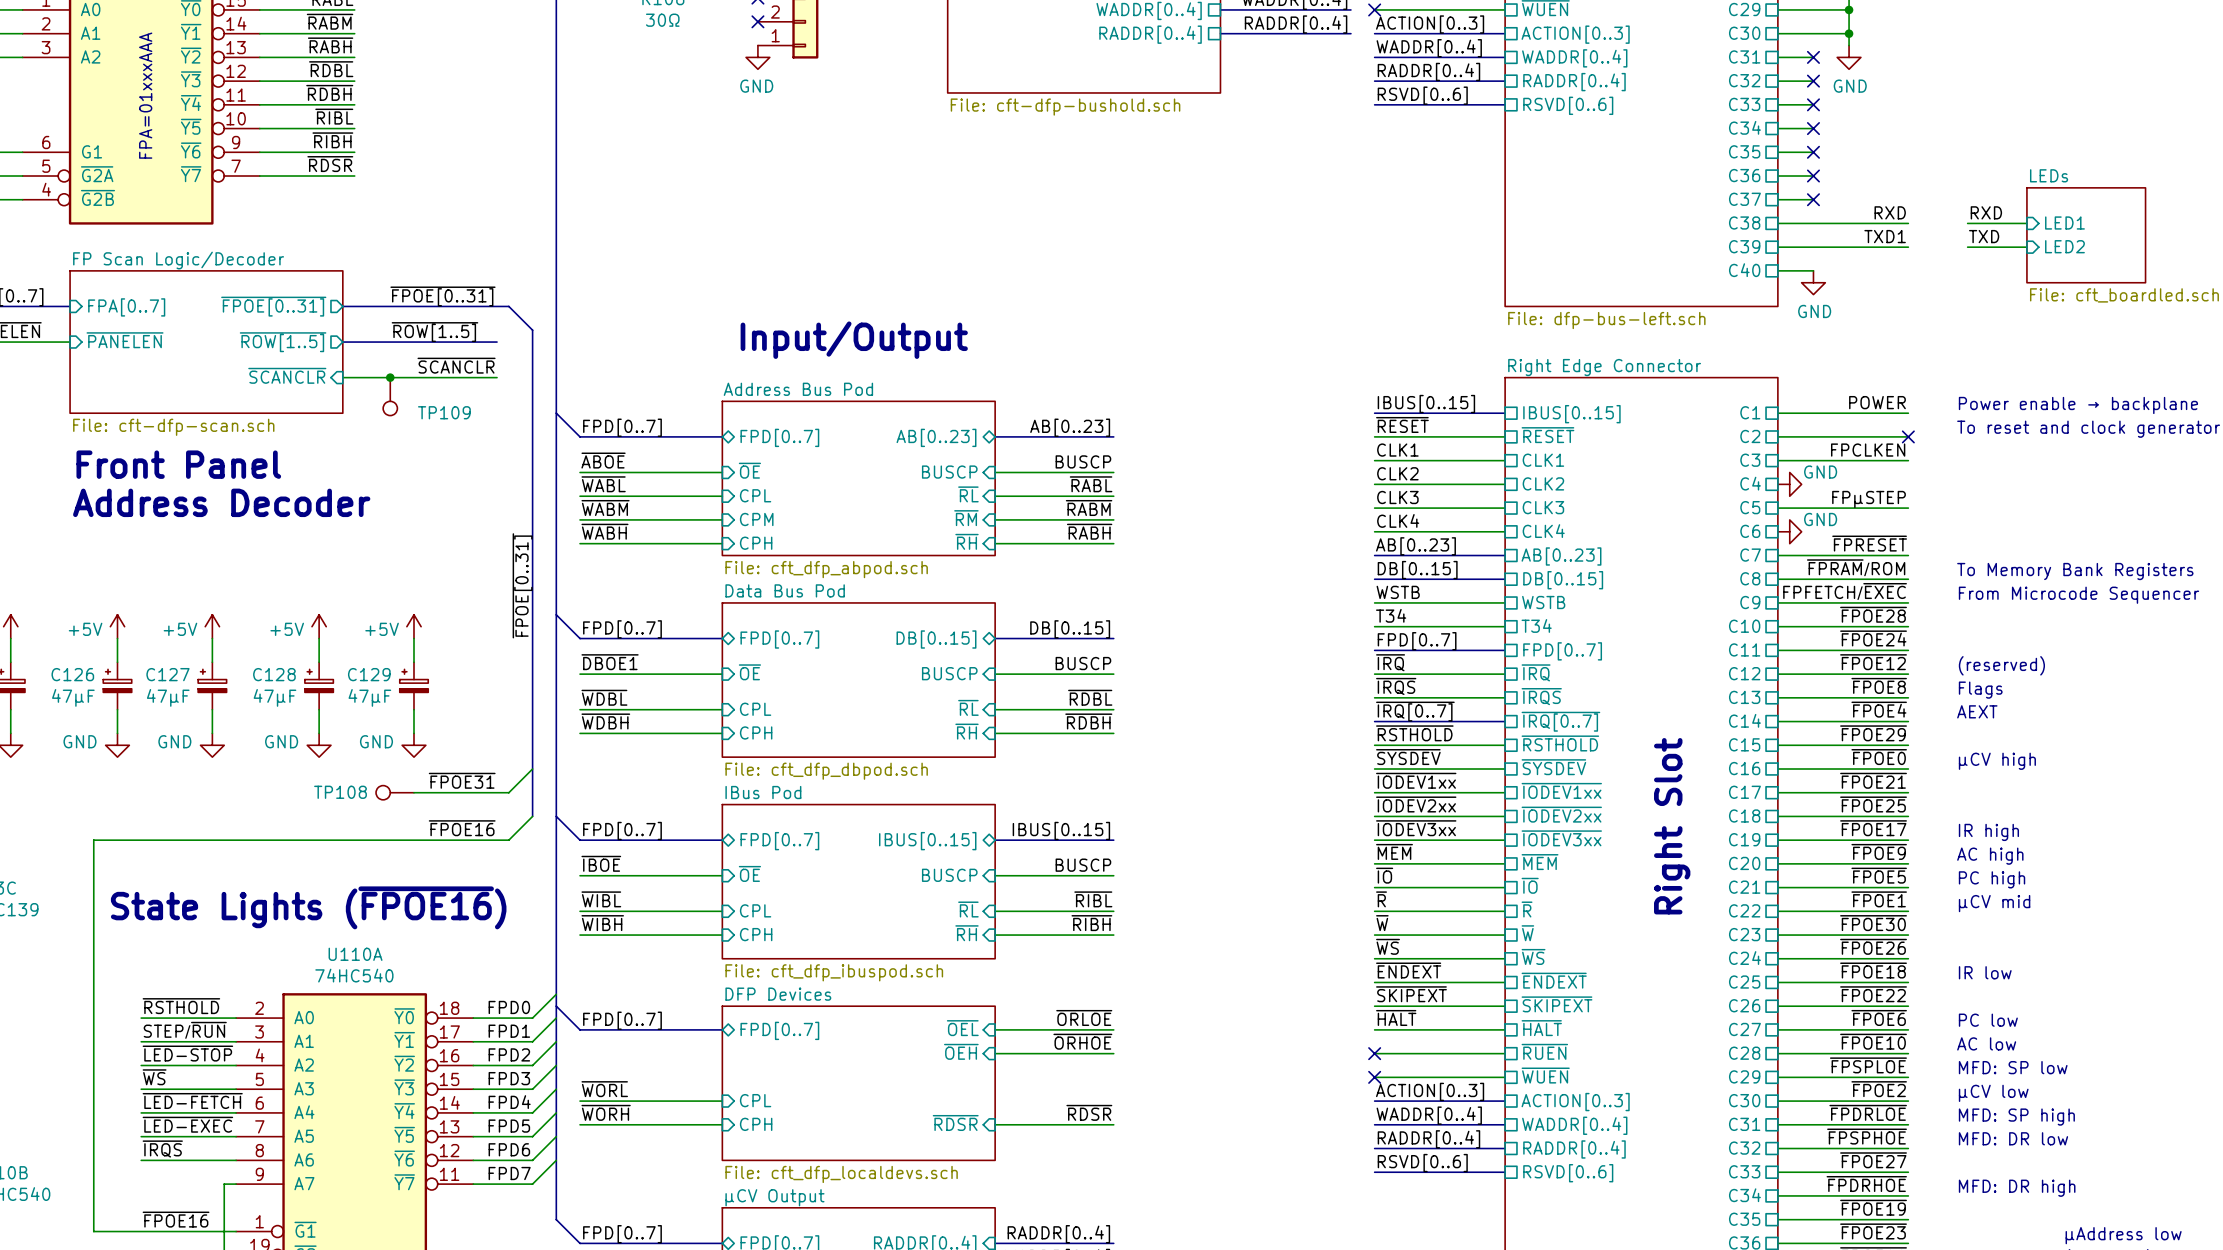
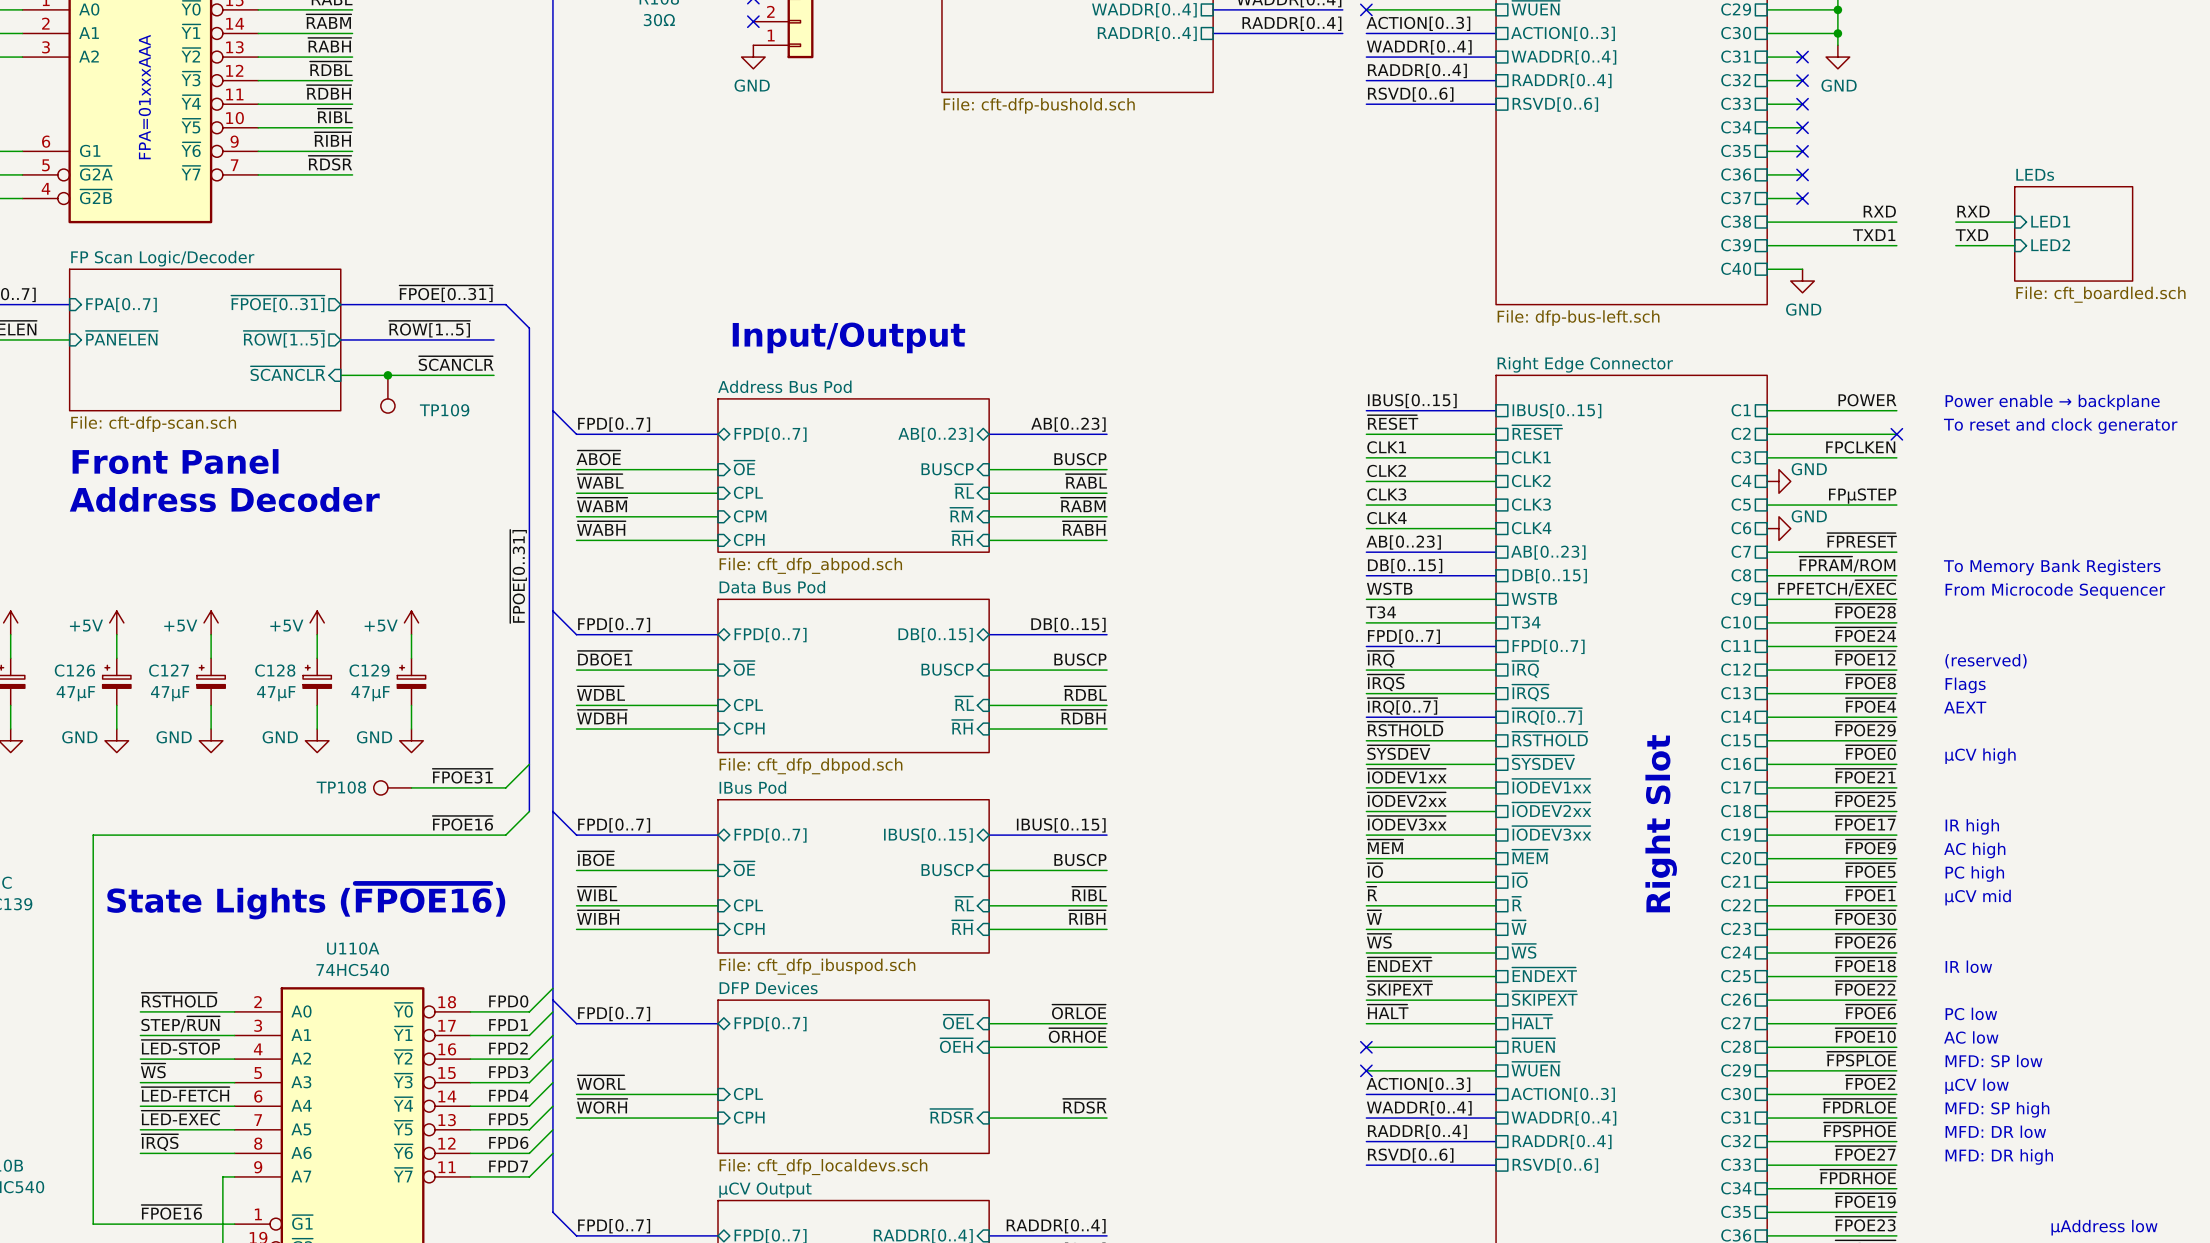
text position: MFD: DR high (2017, 1188) -> MFD: DR high (1999, 1156)

